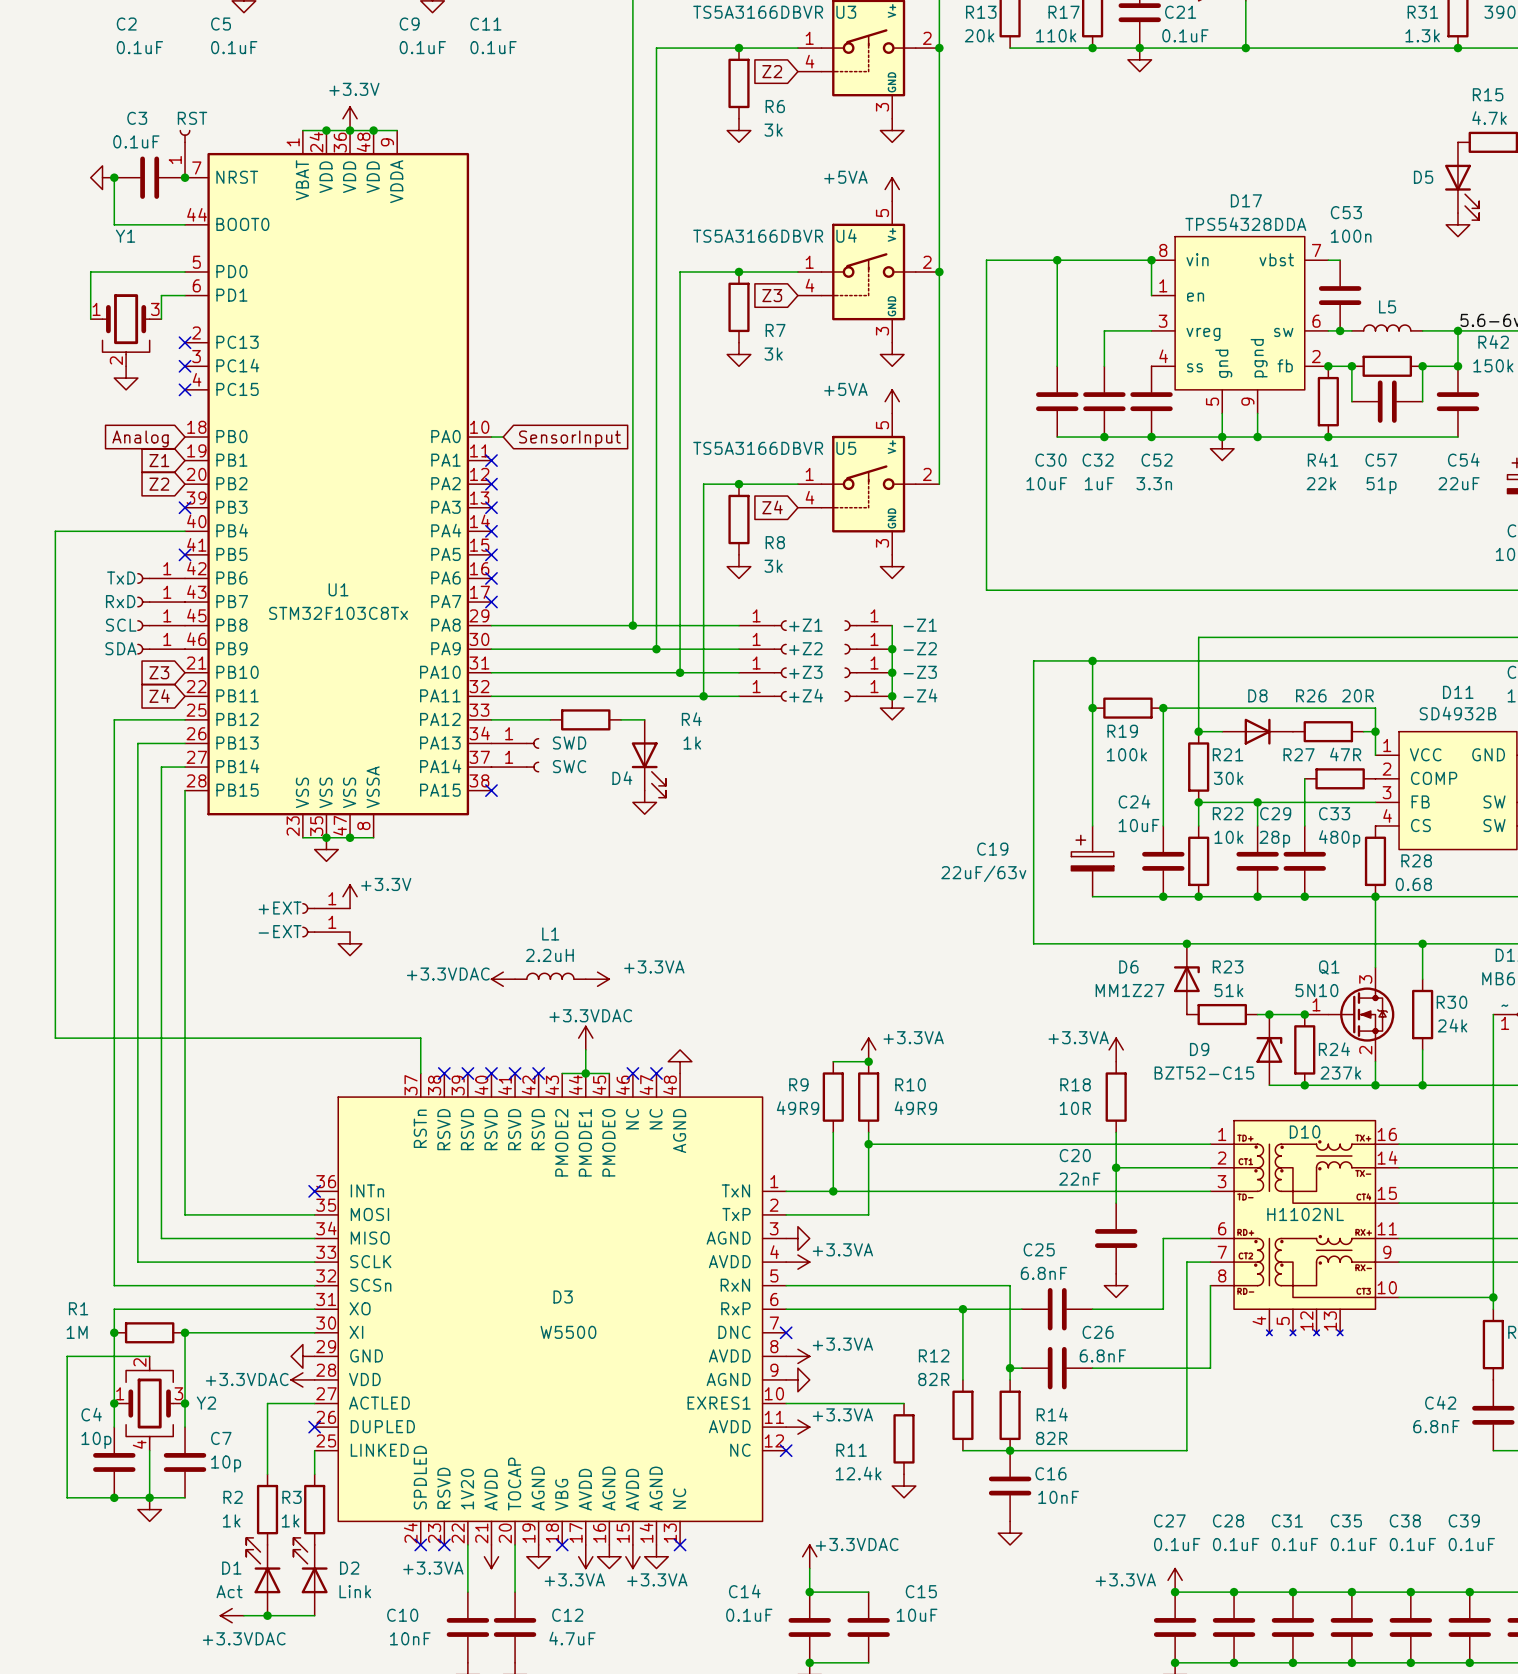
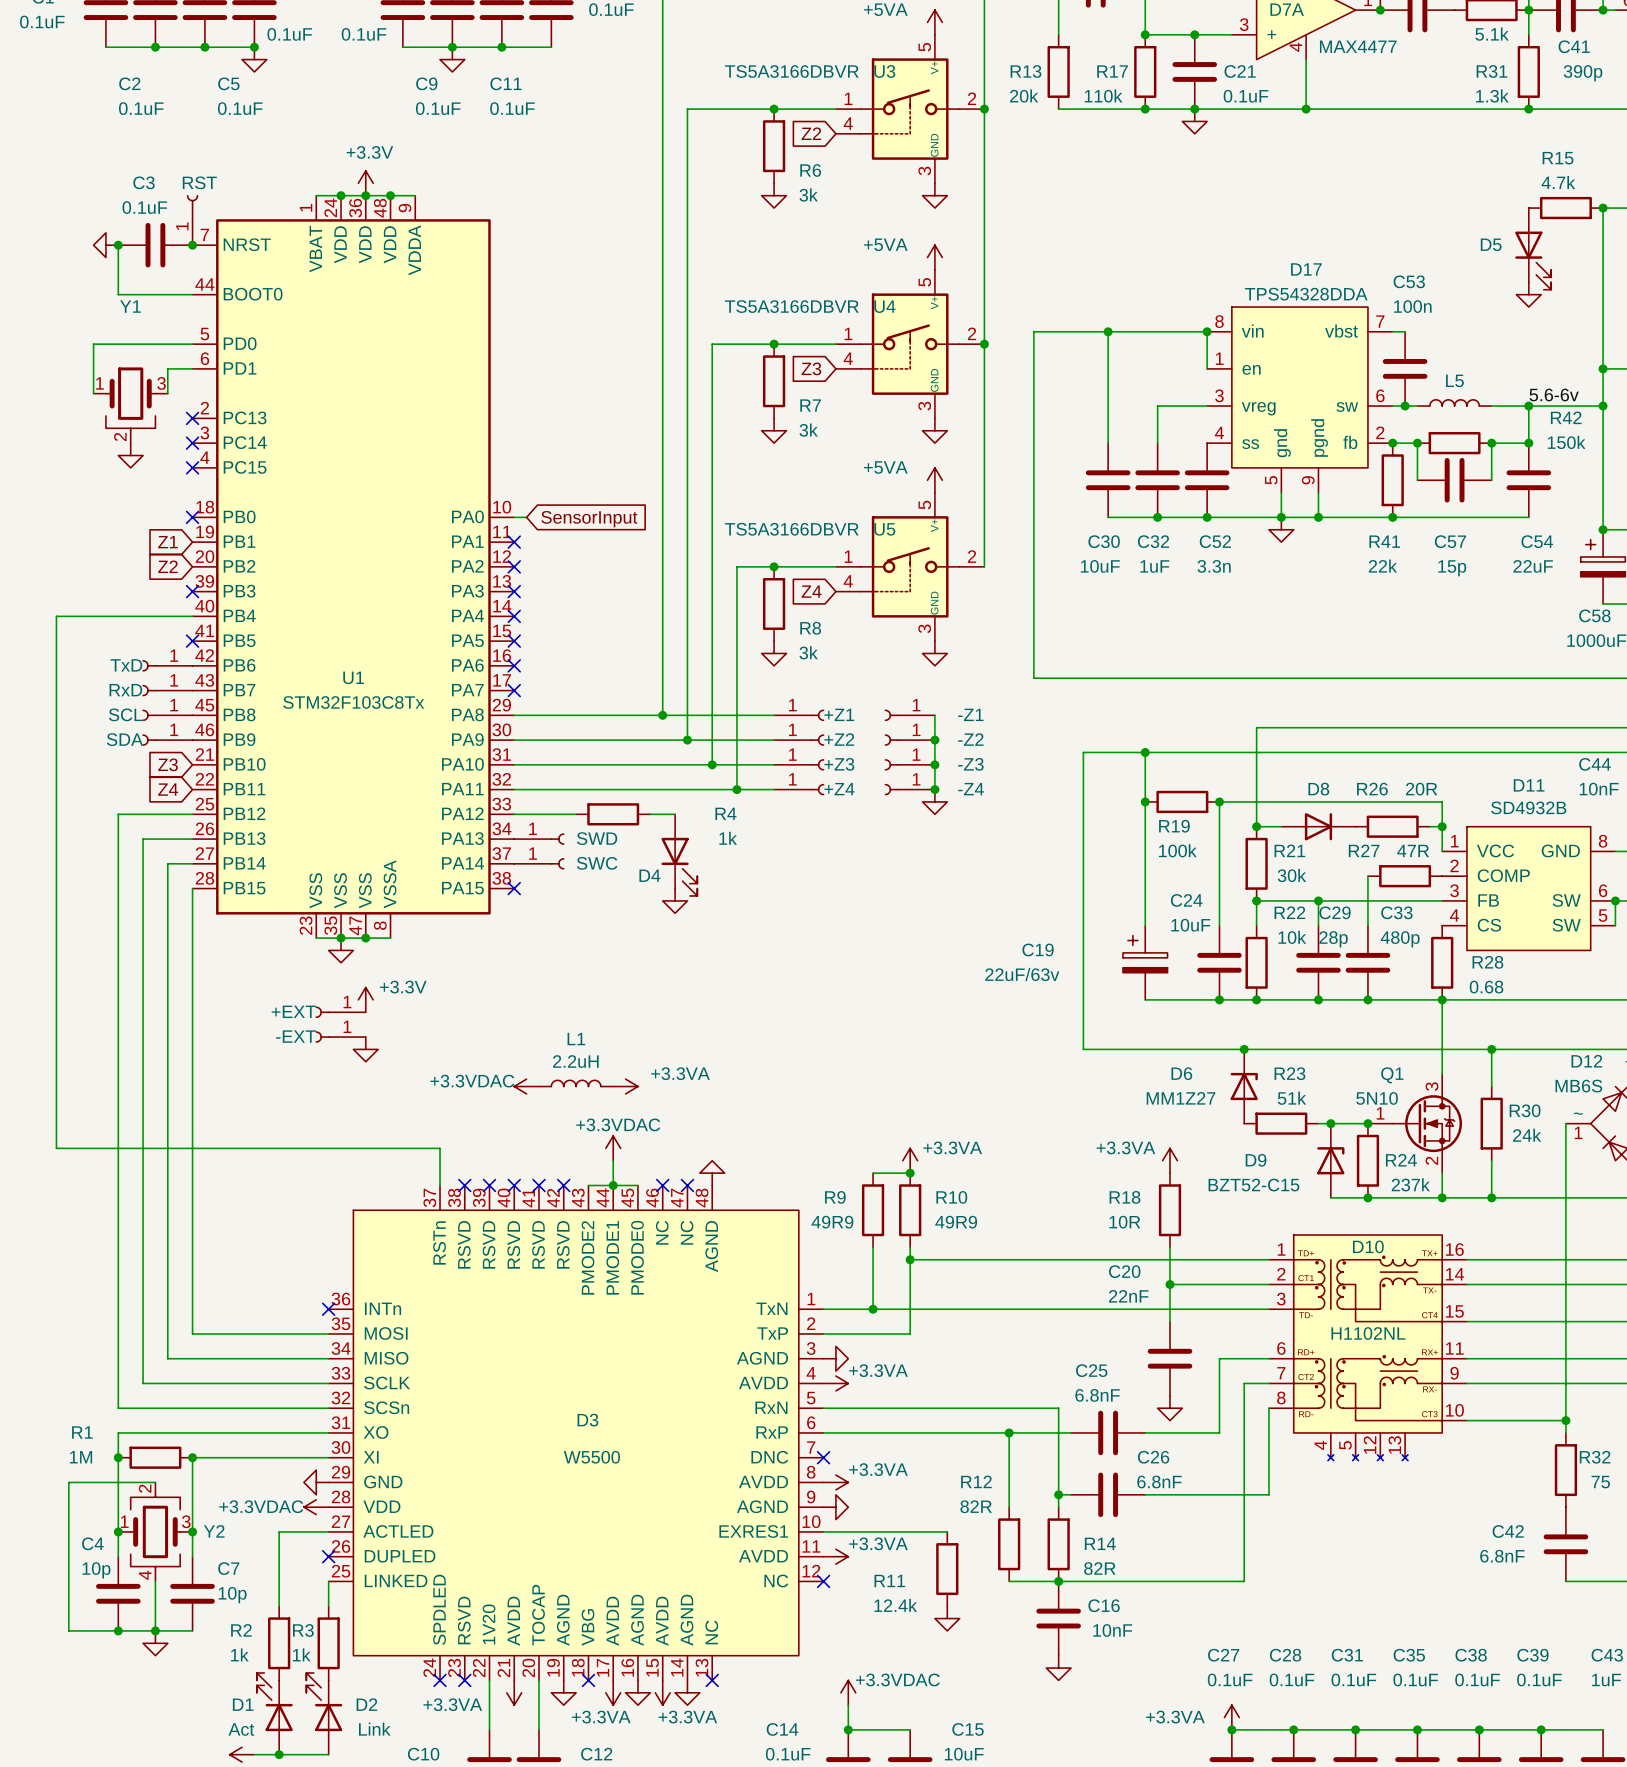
no-connect mark: none -> (192, 517)
global label: Analog (140, 438) -> none
C57 value: 51p (1381, 485) -> 15p (1452, 568)

